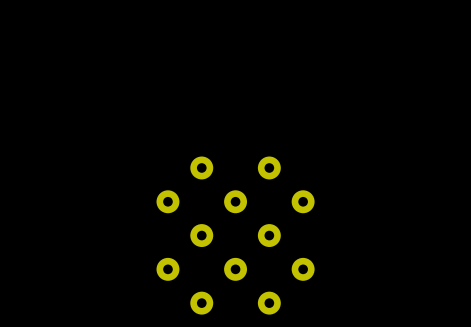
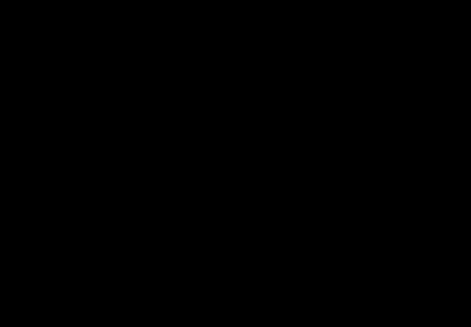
part: (235, 235) -> none

